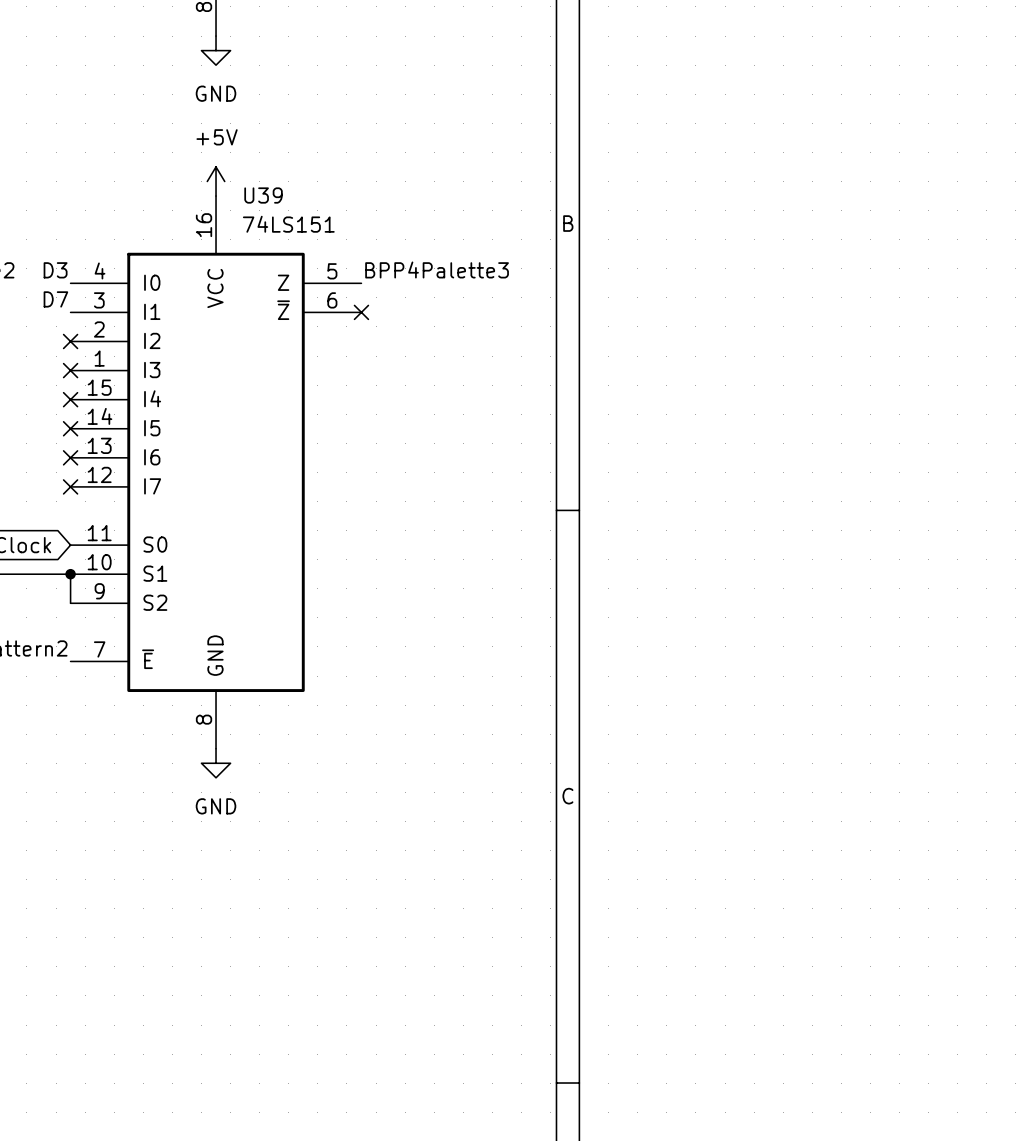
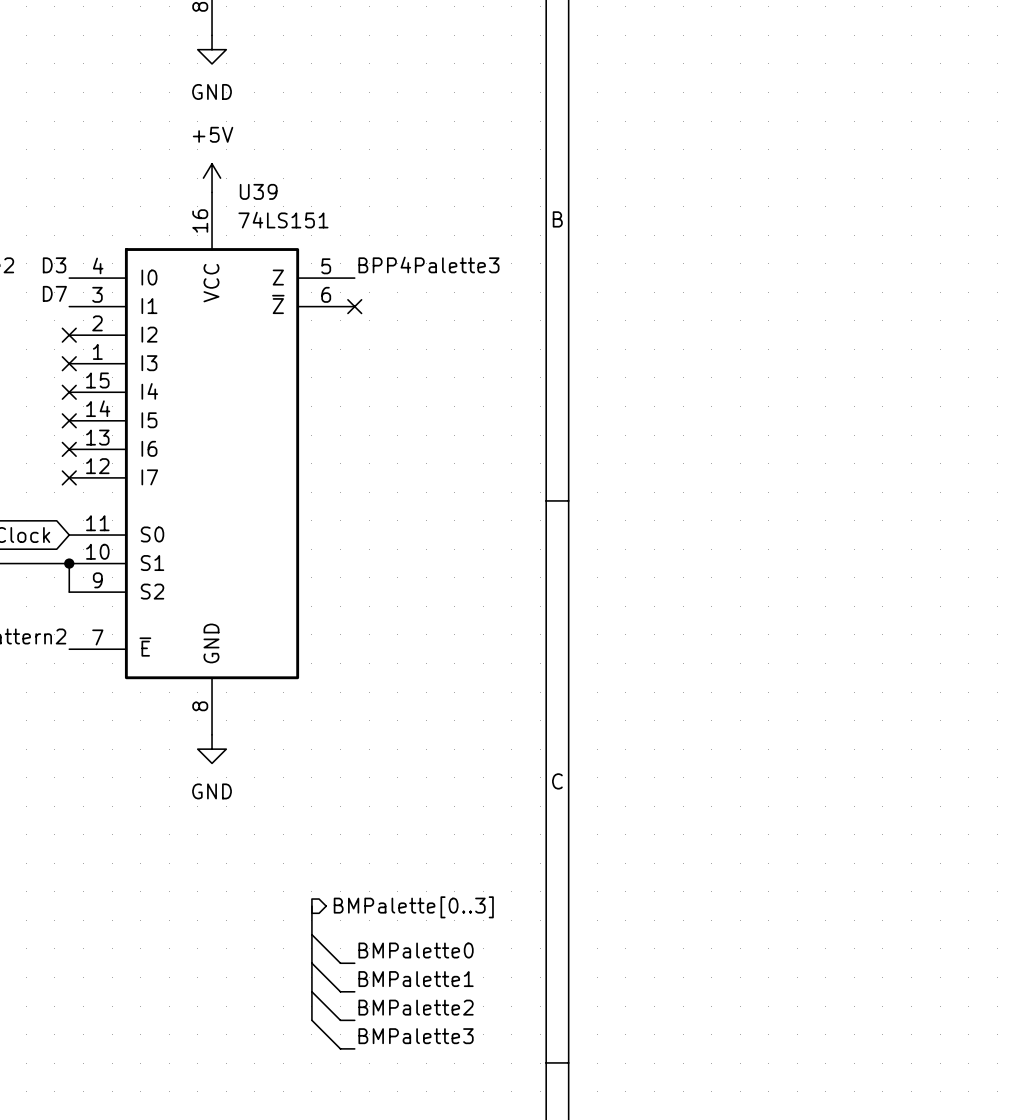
bus: none -> (311, 906) (311, 1020)
hierarchical label: none -> BMPalette[0..3] (413, 907)
wire: none -> (311, 934) (340, 963) (354, 963)
label: none -> BMPalette0 (416, 950)
wire: none -> (311, 963) (340, 991) (354, 991)
label: none -> BMPalette1 (416, 979)
wire: none -> (311, 991) (340, 1020) (354, 1020)
label: none -> BMPalette2 (416, 1007)
wire: none -> (311, 1020) (340, 1048) (354, 1048)
label: none -> BMPalette3 (416, 1036)

